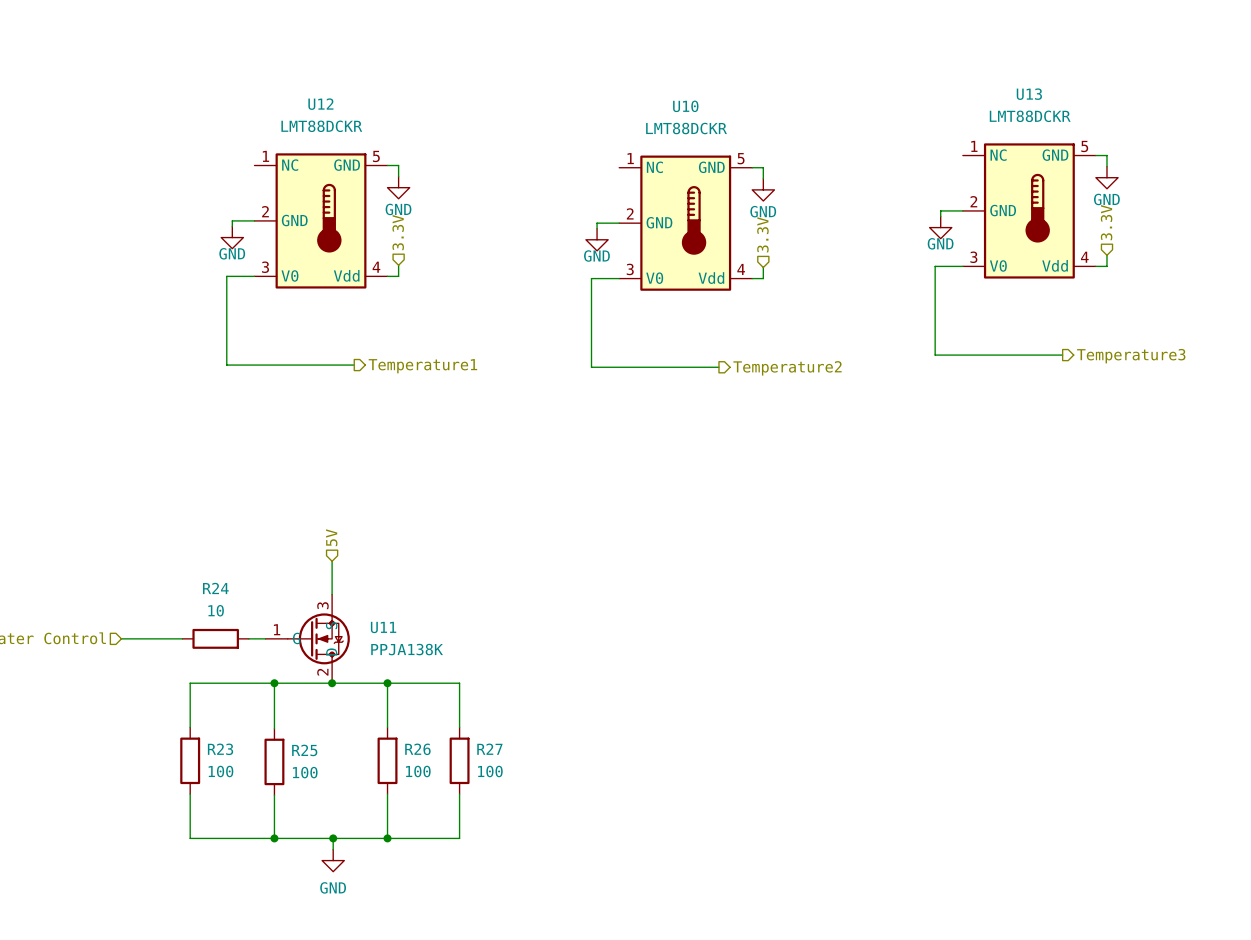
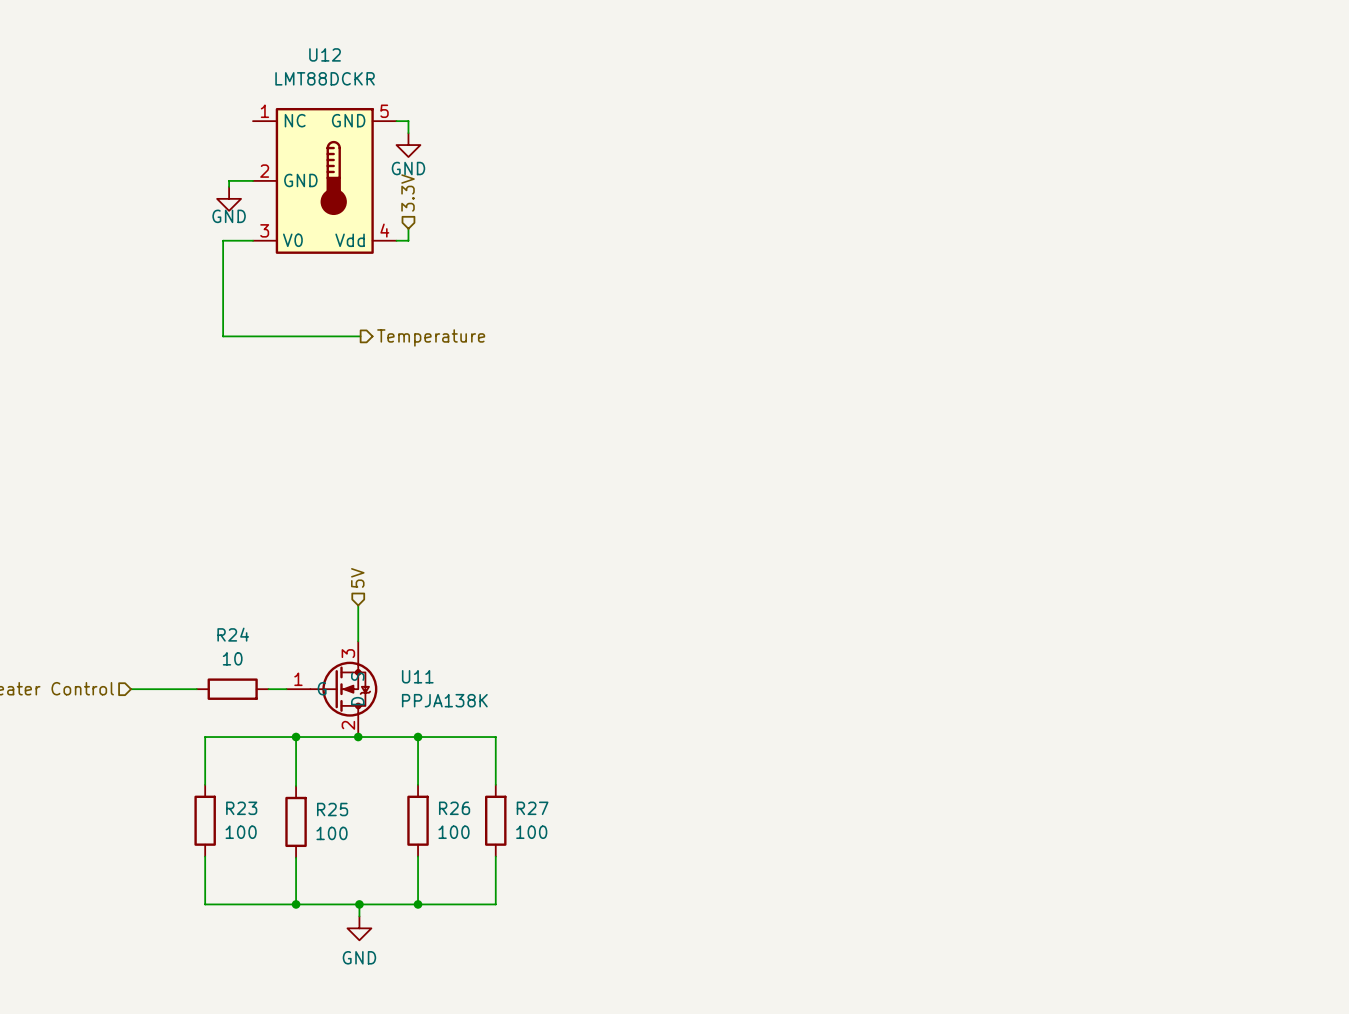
wire: (1095, 155) (1106, 155) (1106, 166) -> none
wire: (387, 165) (398, 165) (398, 176) -> (396, 121) (408, 121) (408, 133)
wire: (752, 167) (763, 167) (763, 178) -> none
power symbol: GND (1106, 177) -> none
power symbol position: GND (398, 187) -> GND (408, 145)
power symbol: GND (763, 189) -> none
wire: (962, 210) (940, 210) (940, 216) -> none
U13: LMT88DCKR (1029, 210) -> none
wire: (254, 220) (232, 220) (232, 226) -> (253, 180) (229, 180) (229, 186)
U12 position: (321, 220) -> (324, 180)
hierarchical label: 3.3V (1106, 222) -> none
wire: (619, 223) (597, 223) (597, 228) -> none
U10: LMT88DCKR (685, 223) -> none
power symbol: GND (940, 227) -> none
hierarchical label position: 3.3V (398, 232) -> 3.3V (408, 192)
hierarchical label: 3.3V (762, 234) -> none
power symbol position: GND (232, 237) -> GND (229, 198)
power symbol: GND (597, 239) -> none
wire: (1106, 255) (1106, 266) (1095, 266) -> none
wire: (398, 265) (398, 276) (387, 276) -> (408, 228) (408, 240) (396, 240)
wire: (962, 266) (935, 266) (935, 355) (1062, 355) -> none
wire: (763, 267) (763, 278) (752, 278) -> none
wire: (254, 276) (226, 276) (226, 365) (354, 365) -> (253, 240) (223, 240) (223, 336) (360, 336)
wire: (619, 278) (591, 278) (591, 367) (718, 367) -> none
hierarchical label: none -> Temperature (431, 337)
hierarchical label: Temperature3 (1131, 356) -> none
hierarchical label: Temperature1 (422, 366) -> none
hierarchical label: Temperature2 (787, 368) -> none

